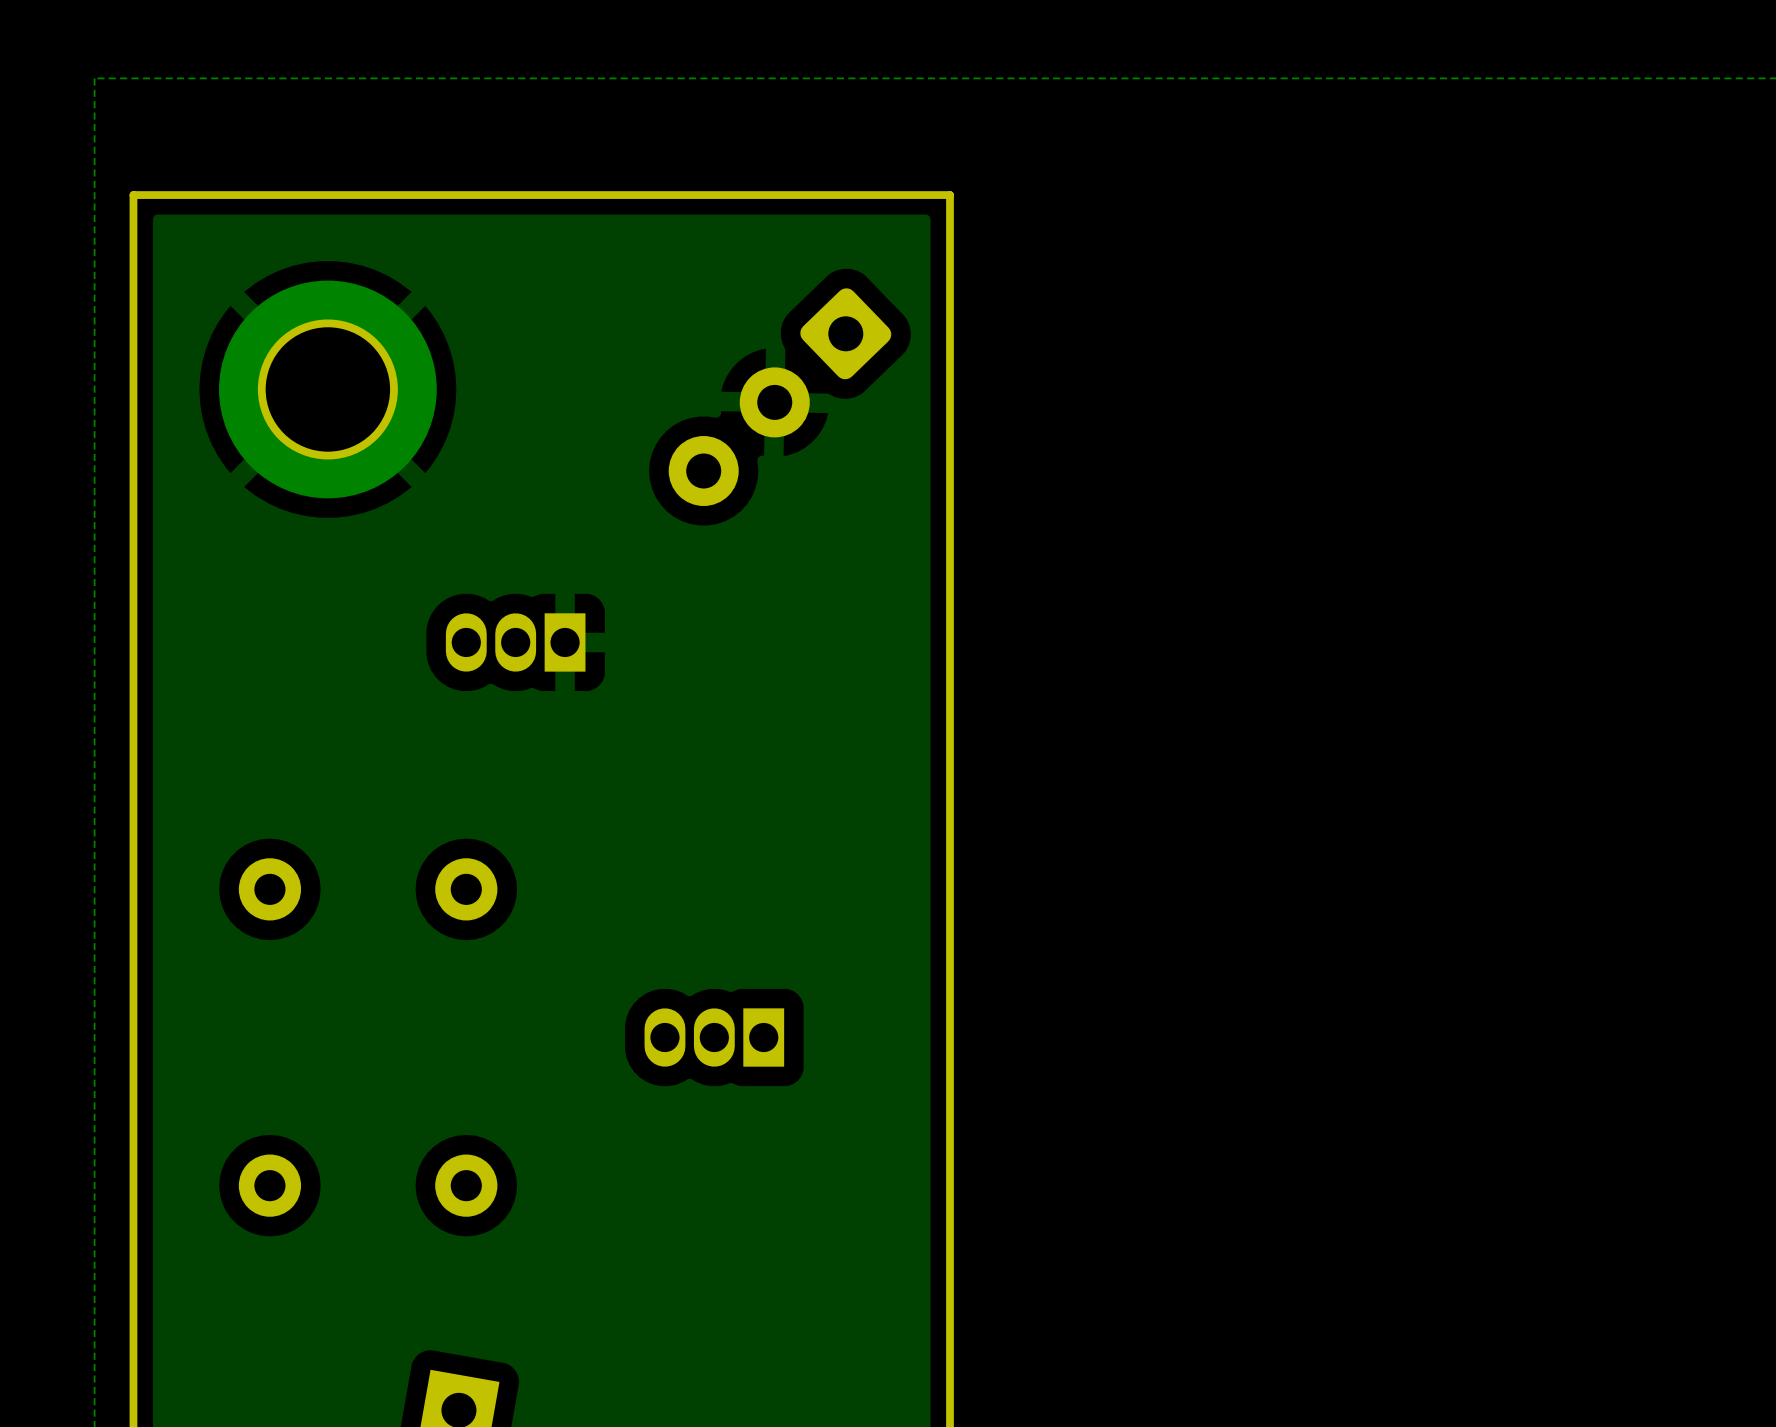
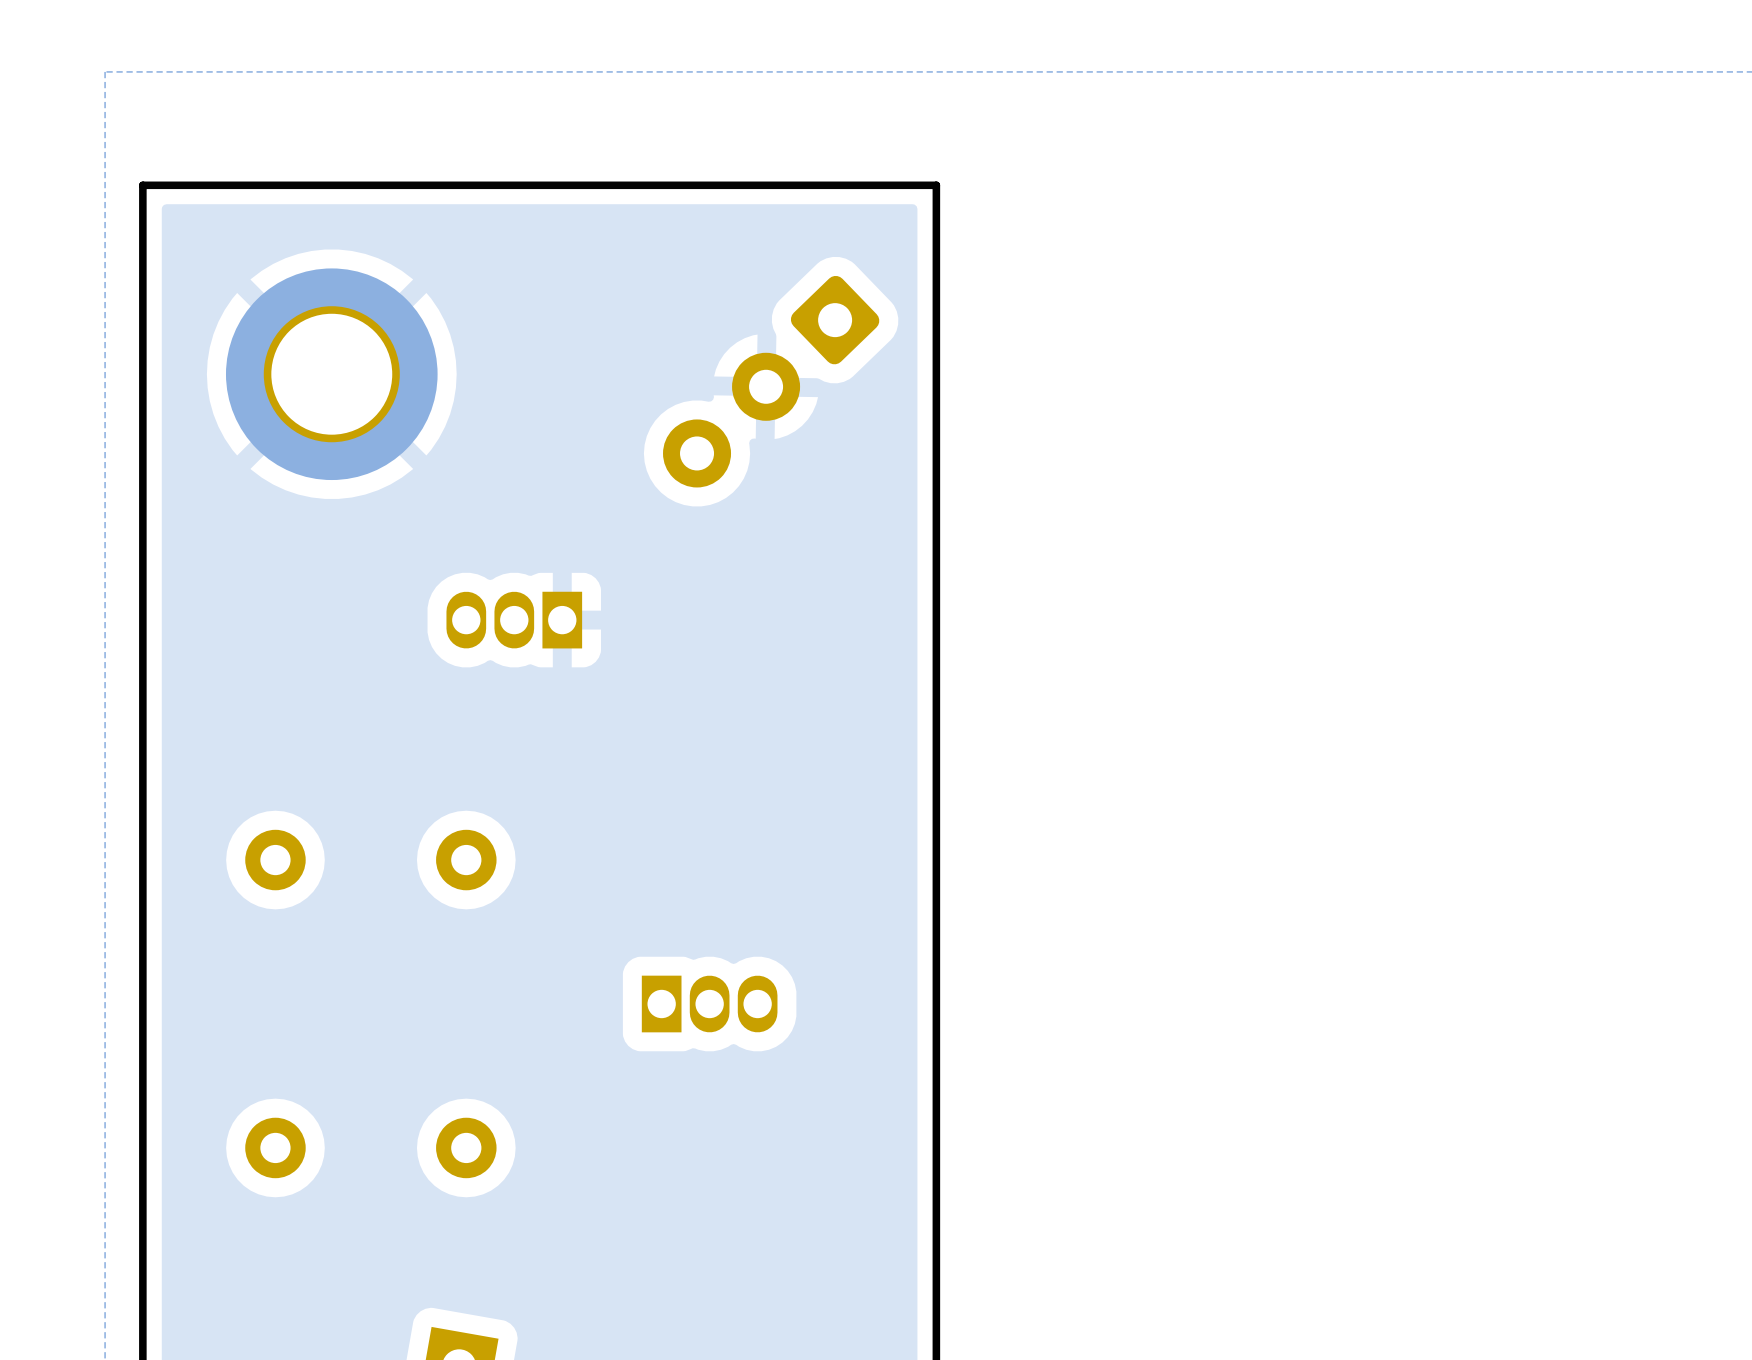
part rotation: 0° (714, 1037) -> 180° (709, 1004)

